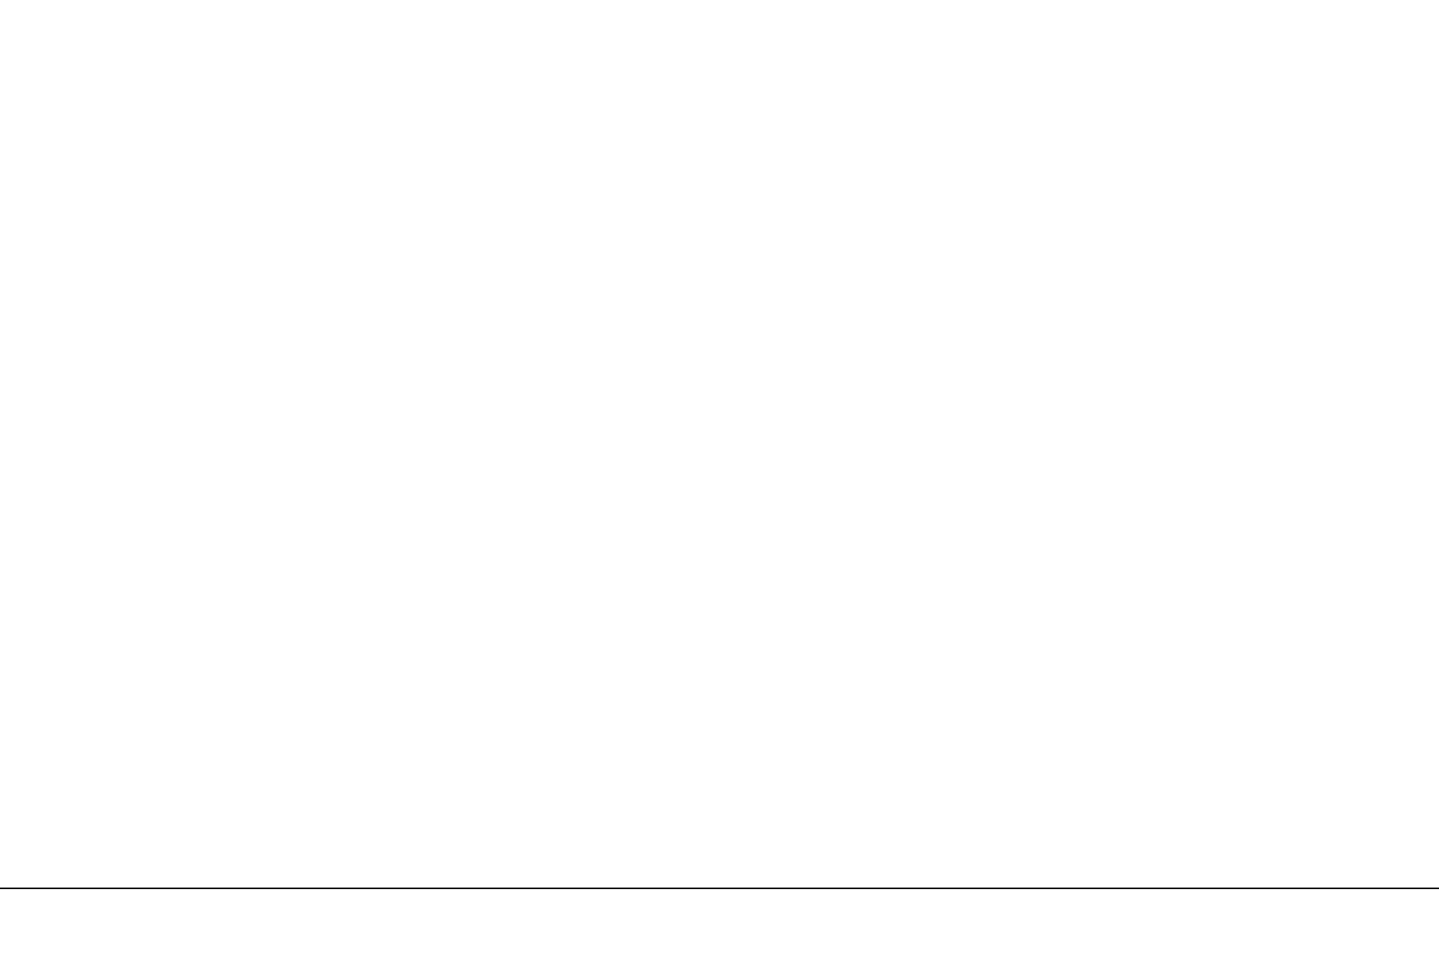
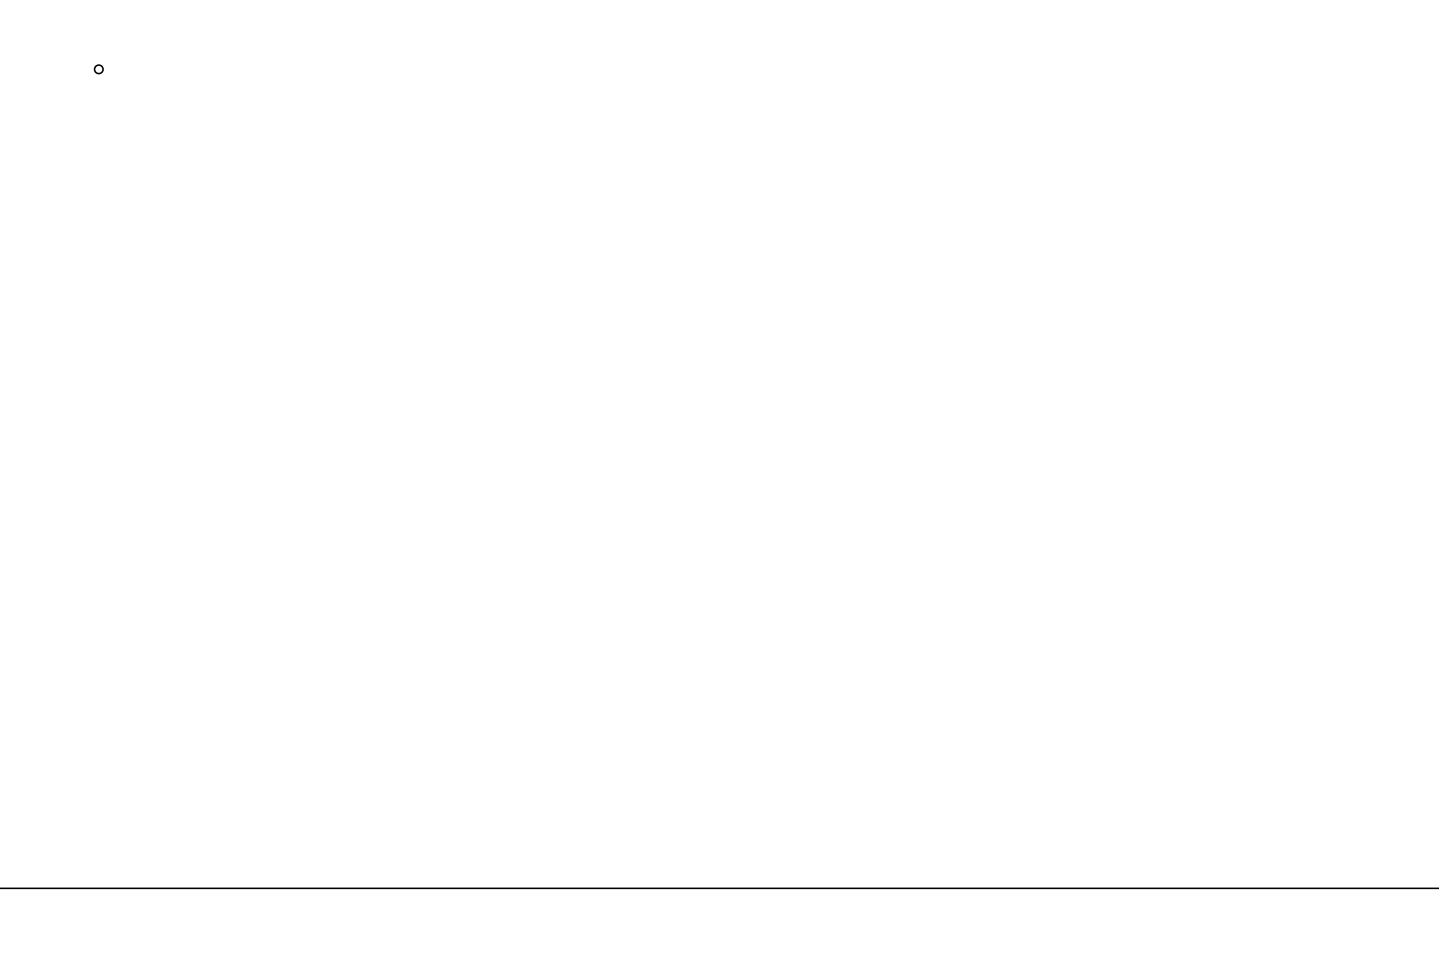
hole: none -> (98, 69)

